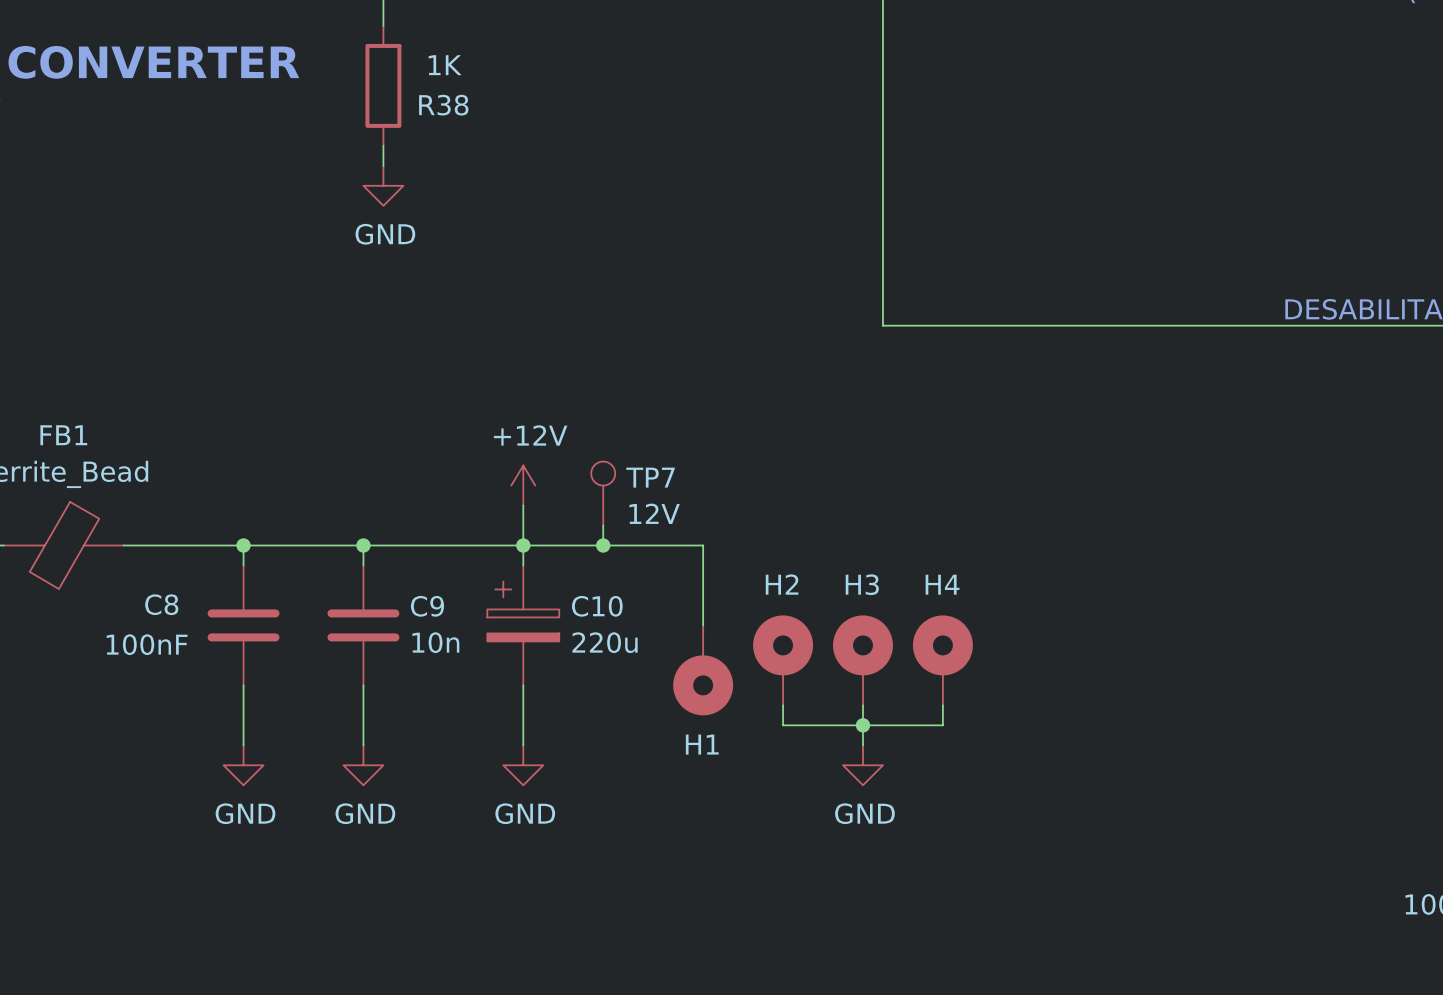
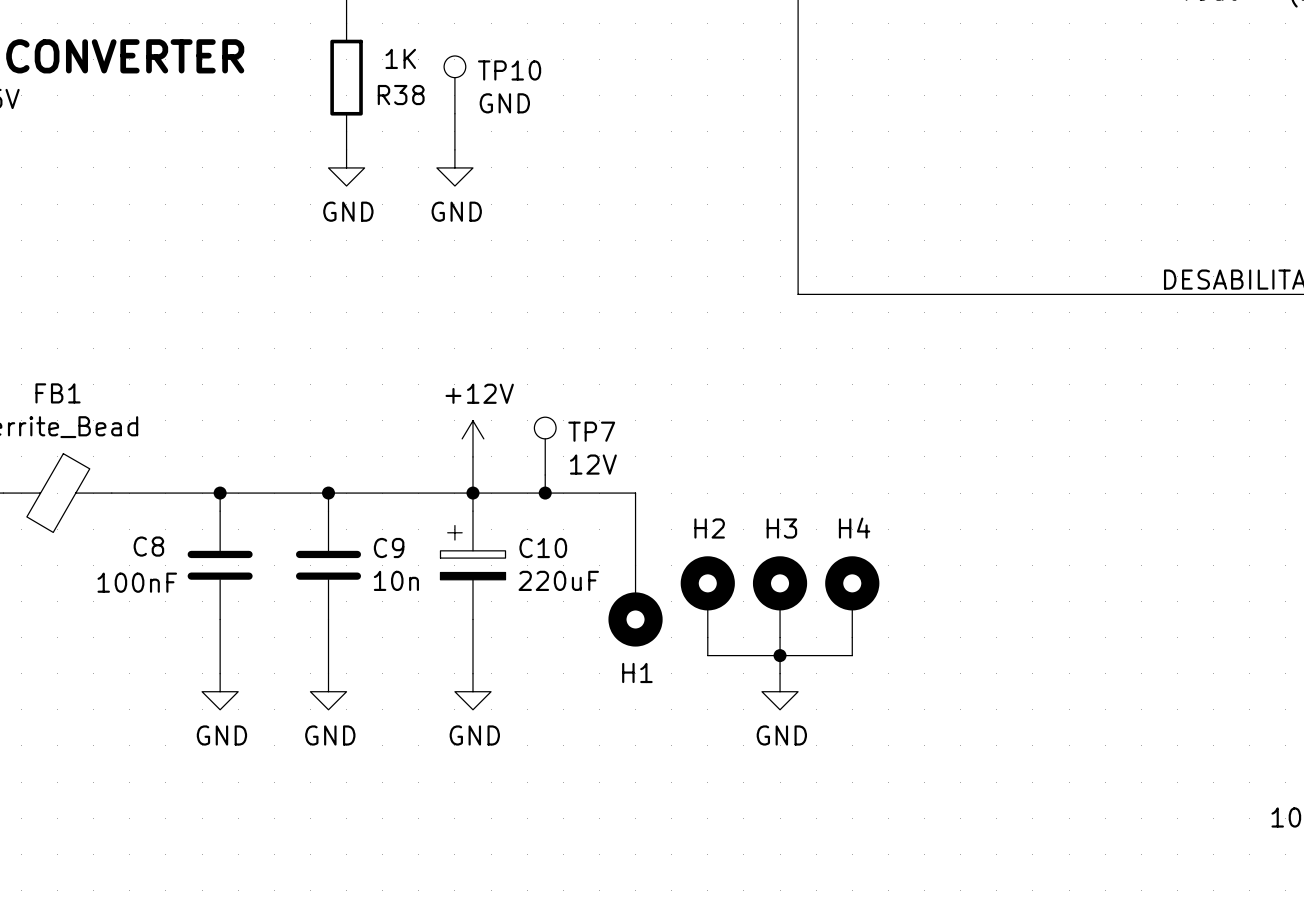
TP10: none -> GND (454, 84)
wire: none -> (454, 113) (454, 149)
power symbol: none -> GND (454, 167)
C10 value: 220u (605, 642) -> 220uF (558, 580)

